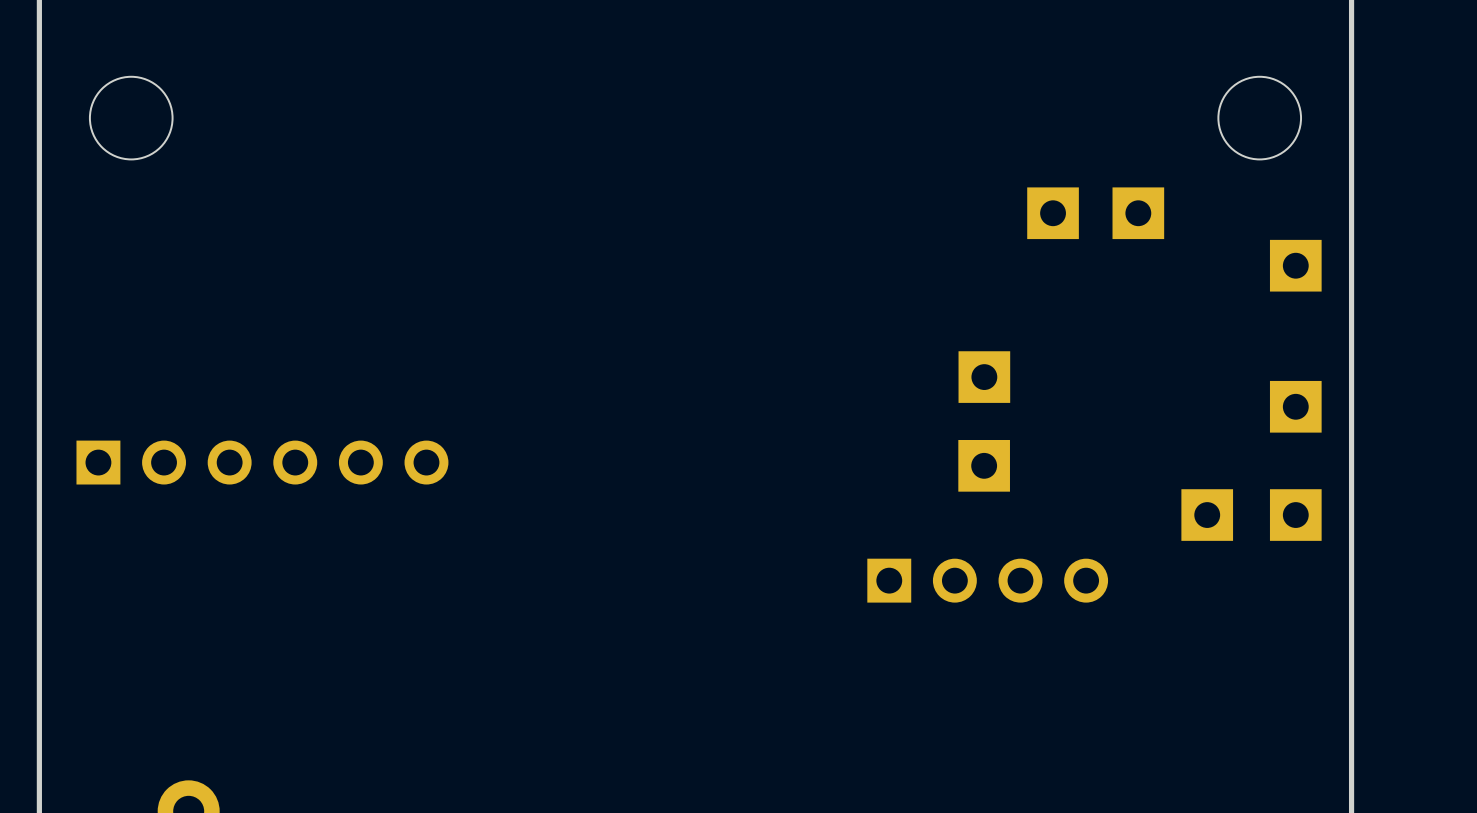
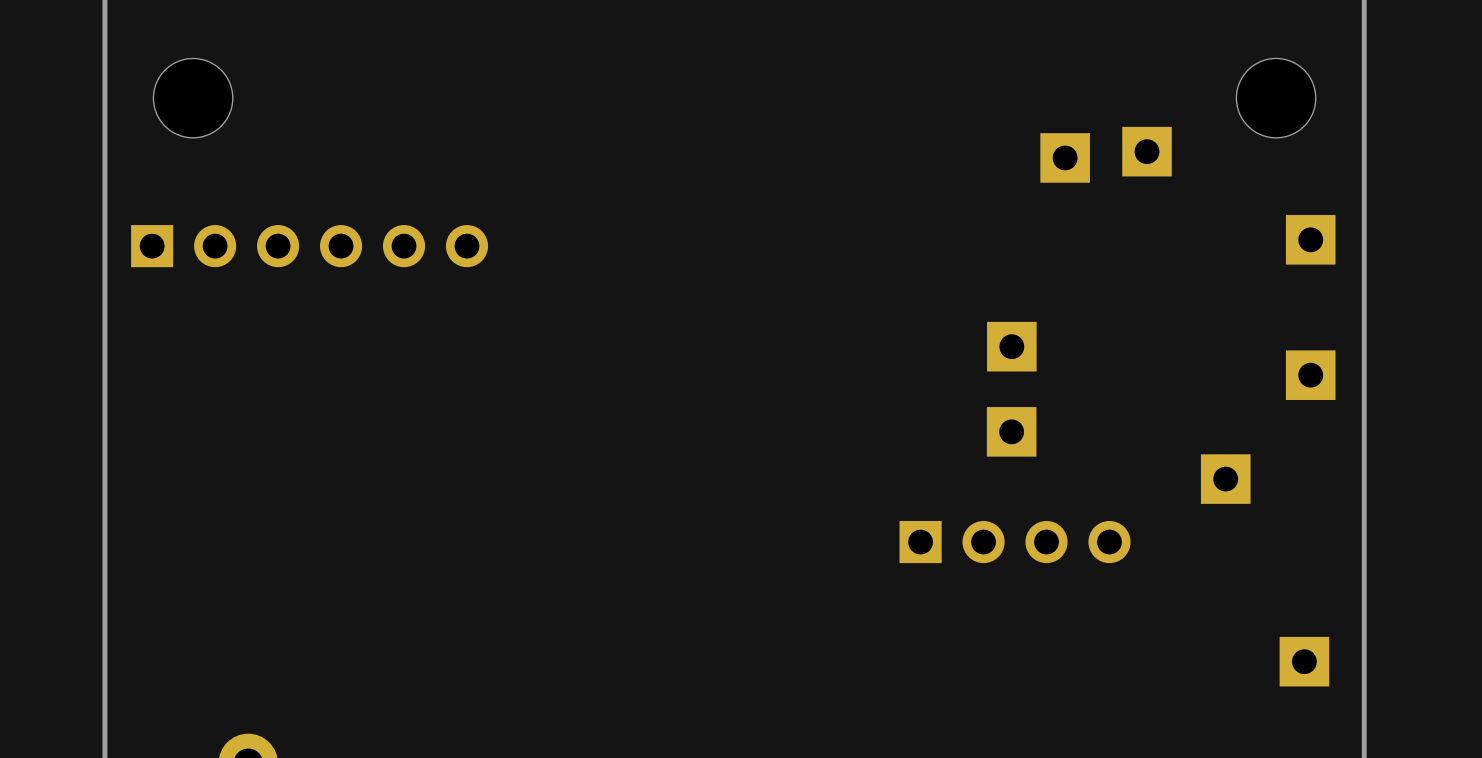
part: none -> (1147, 151)
part position: (1053, 213) -> (1065, 157)
part: (1138, 213) -> none
part position: (262, 462) -> (309, 246)
part position: (1295, 515) -> (1304, 661)

